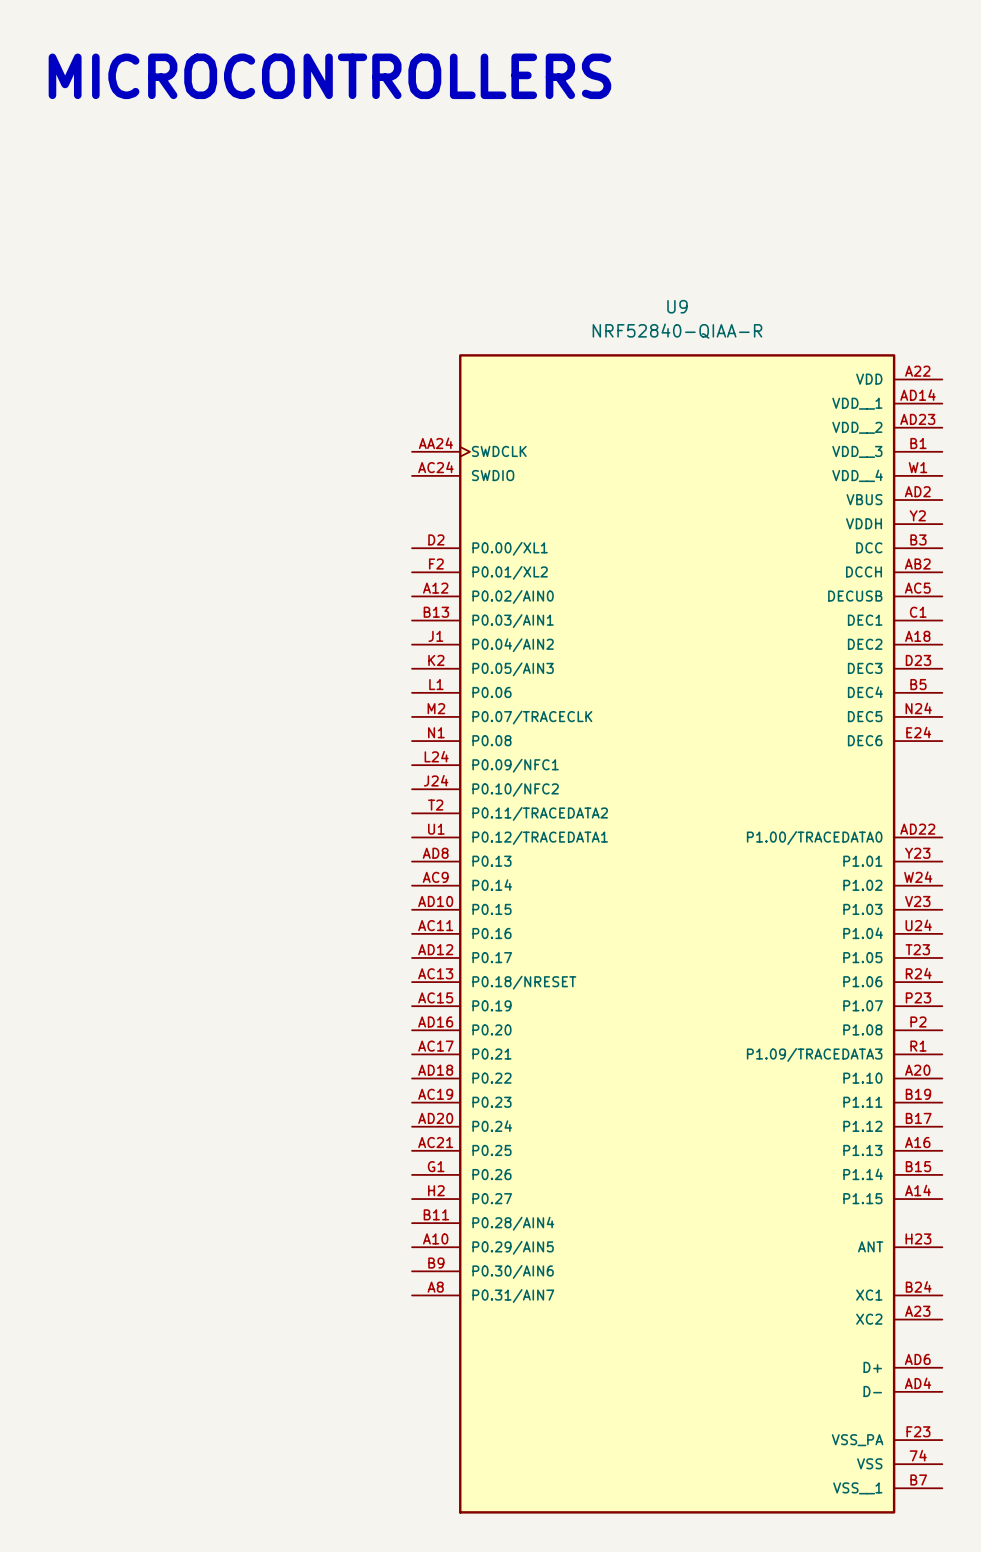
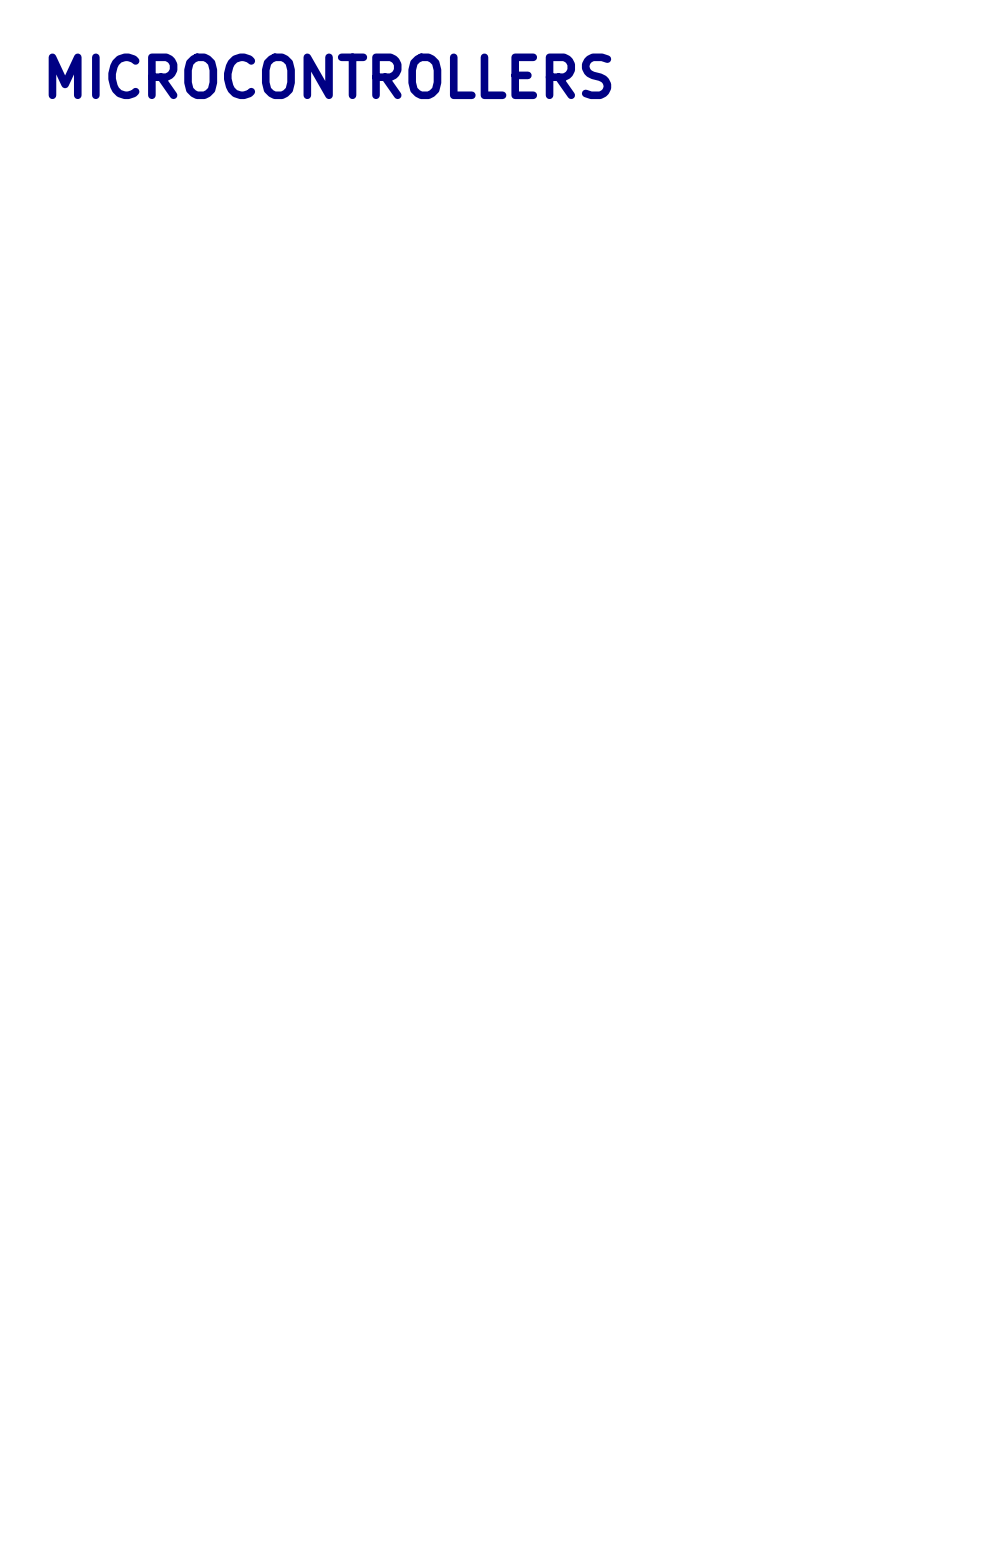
U9: NRF52840-QIAA-R (677, 933) -> none

